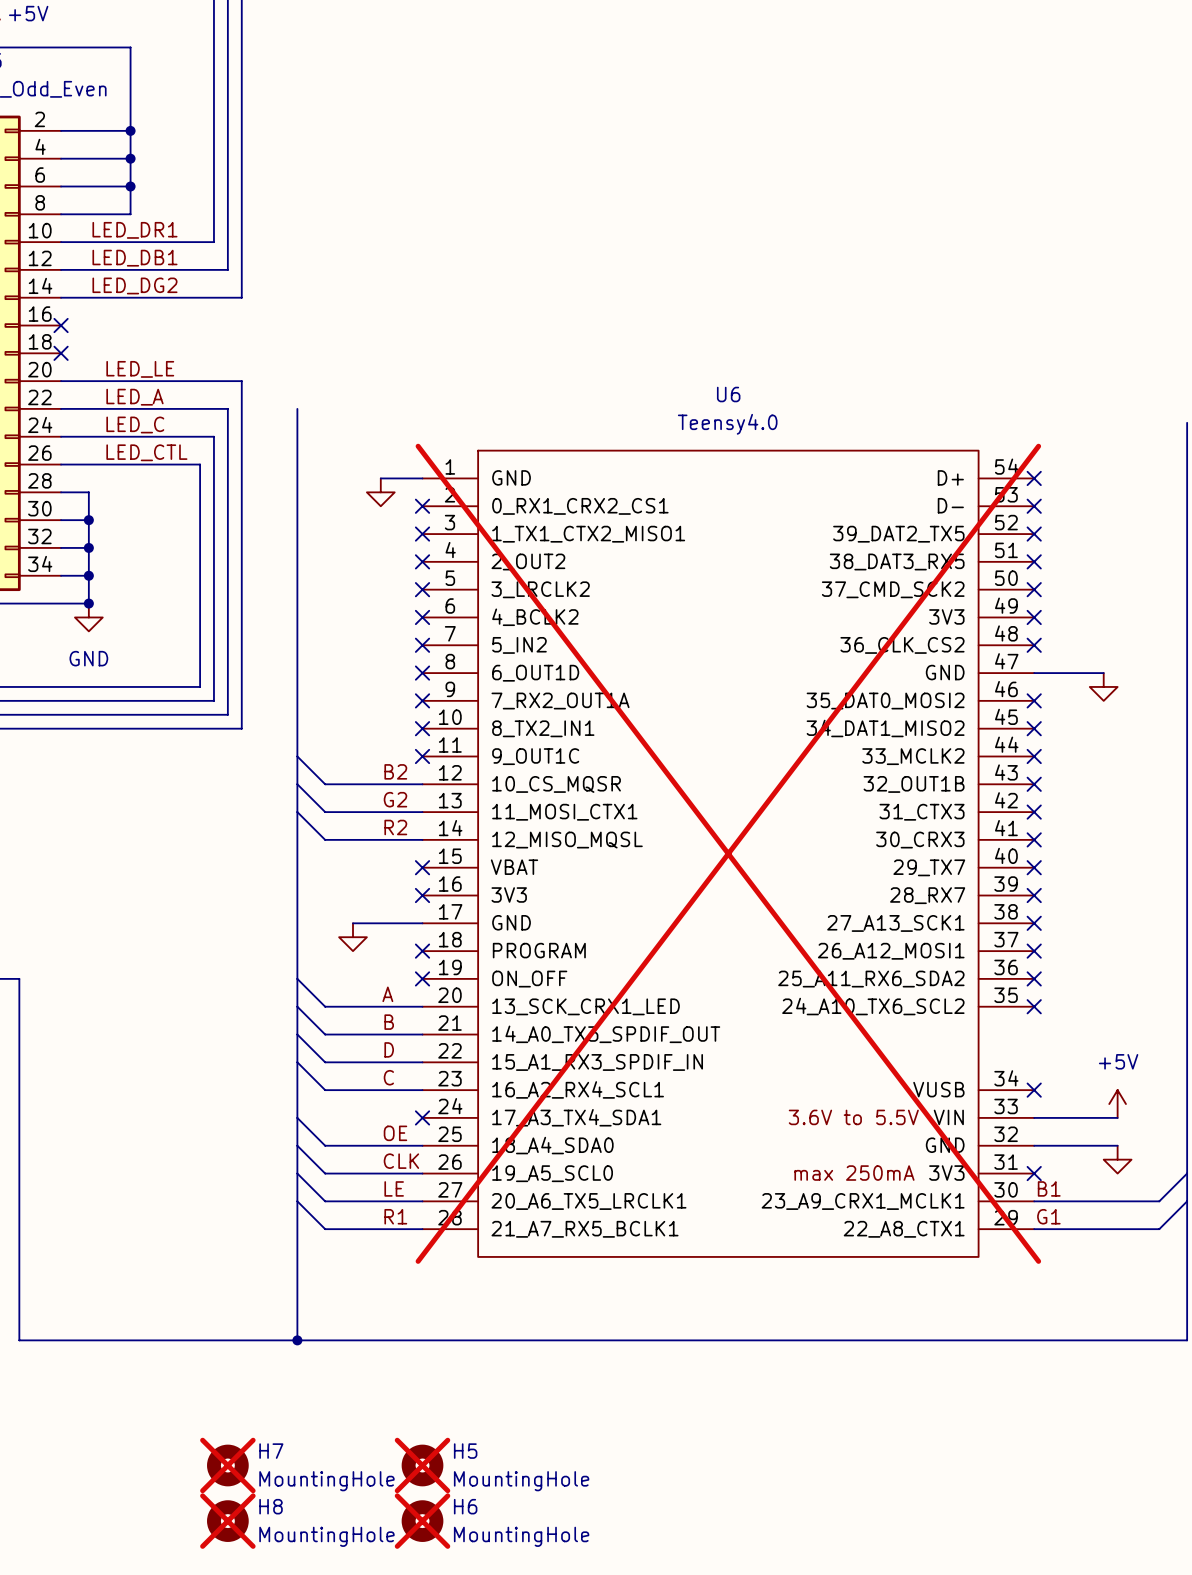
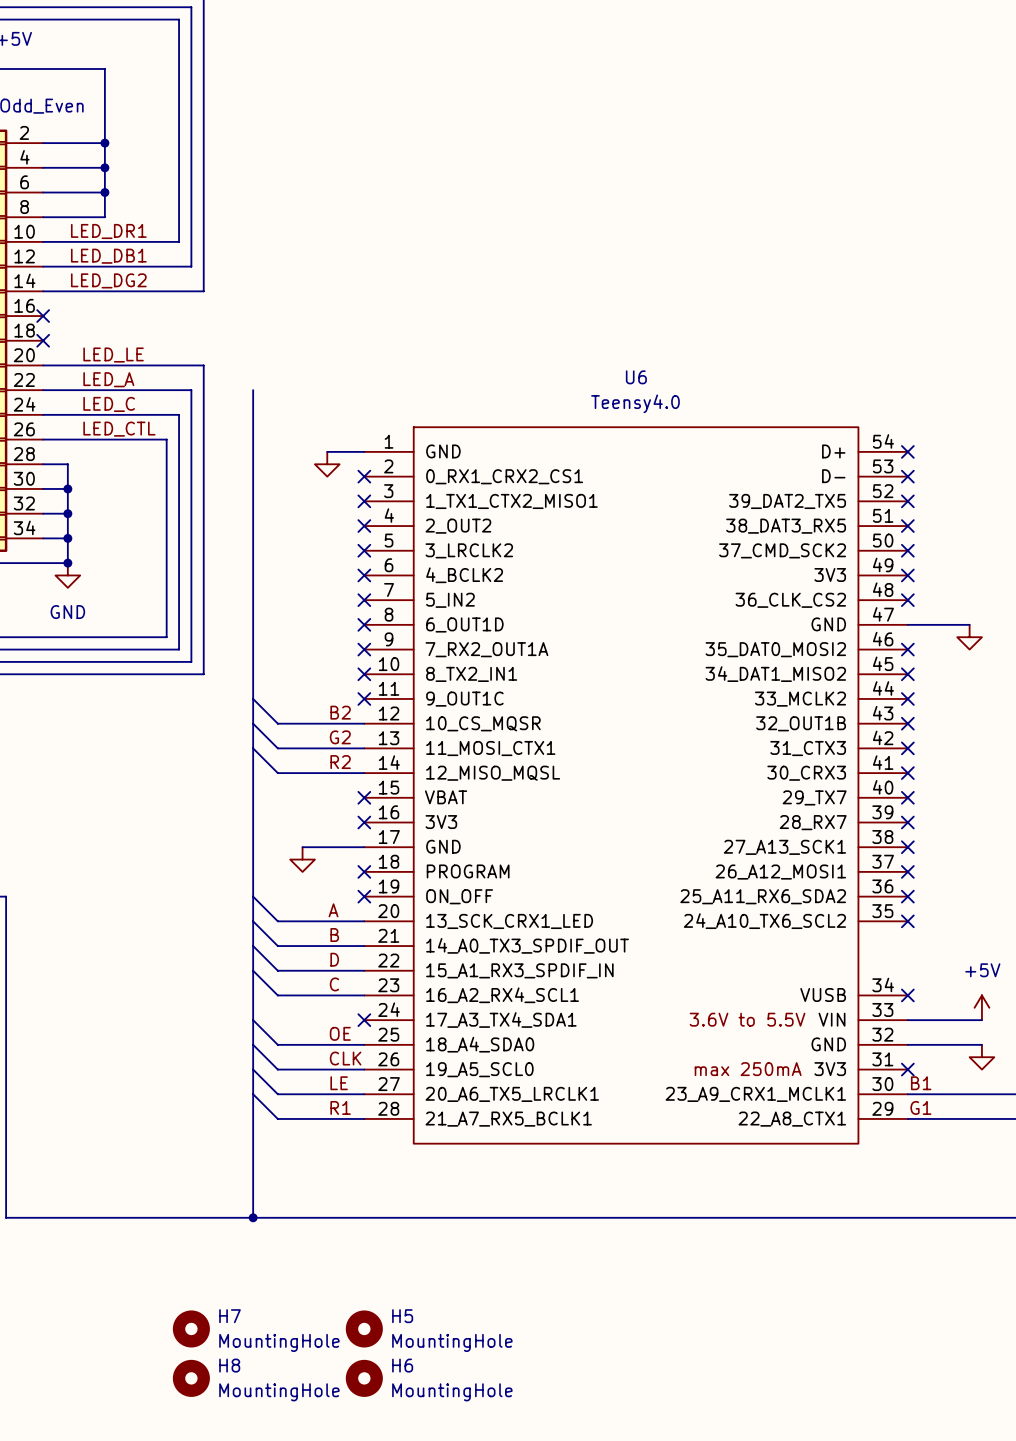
U6 do-not-place cross: (728, 853) -> none
H7 do-not-place cross: (227, 1465) -> none
H5 do-not-place cross: (422, 1465) -> none
H8 do-not-place cross: (227, 1521) -> none
H6 do-not-place cross: (422, 1521) -> none

